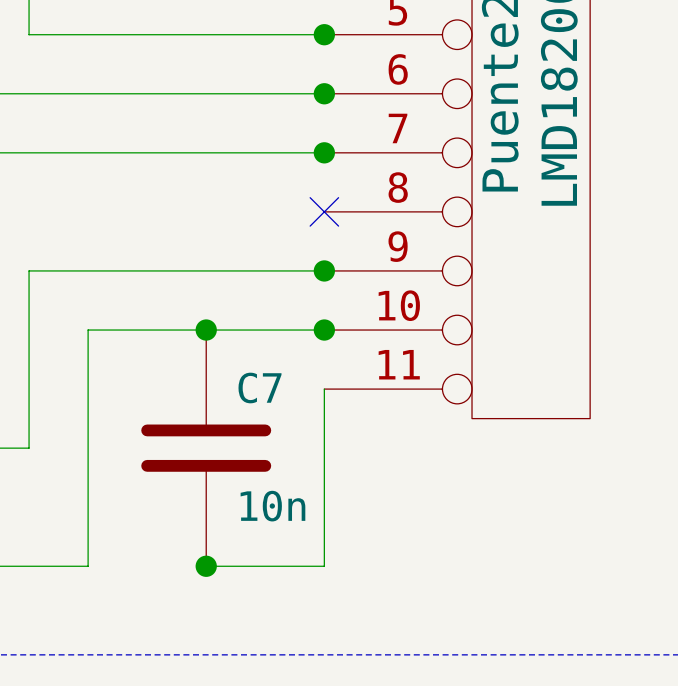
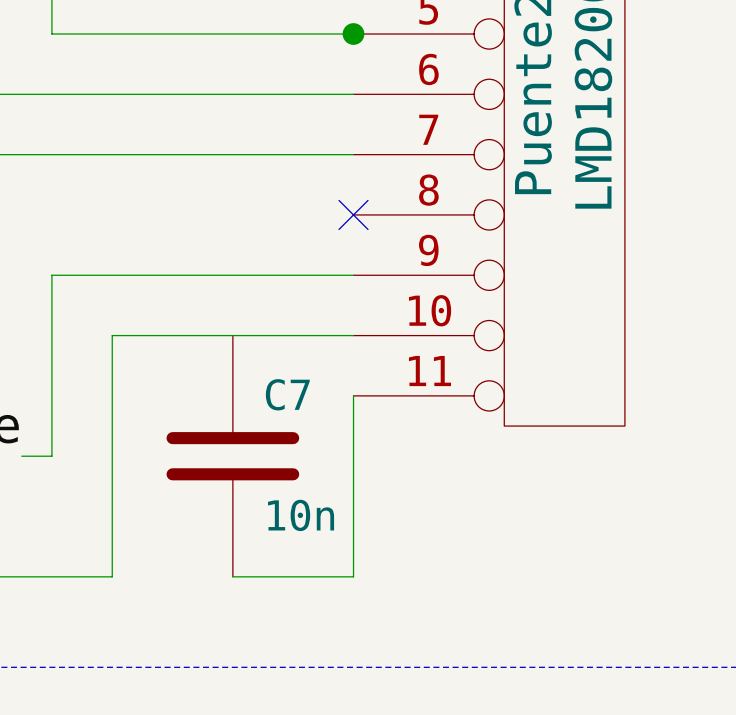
junction: (324, 93) -> none
junction: (324, 152) -> none
junction: (324, 270) -> none
junction: (206, 330) -> none
junction: (324, 330) -> none
junction: (206, 566) -> none

